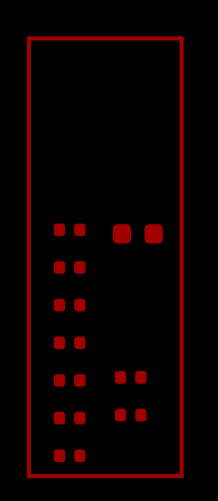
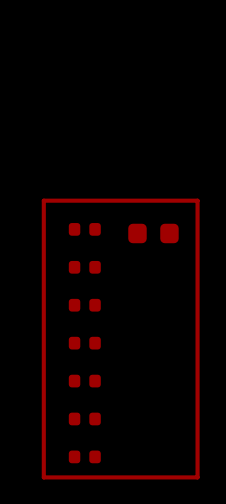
top track: (28, 201) (28, 38) (181, 38) (181, 201) -> (43, 200) (197, 200)
part: (130, 377) -> none
part: (130, 415) -> none

